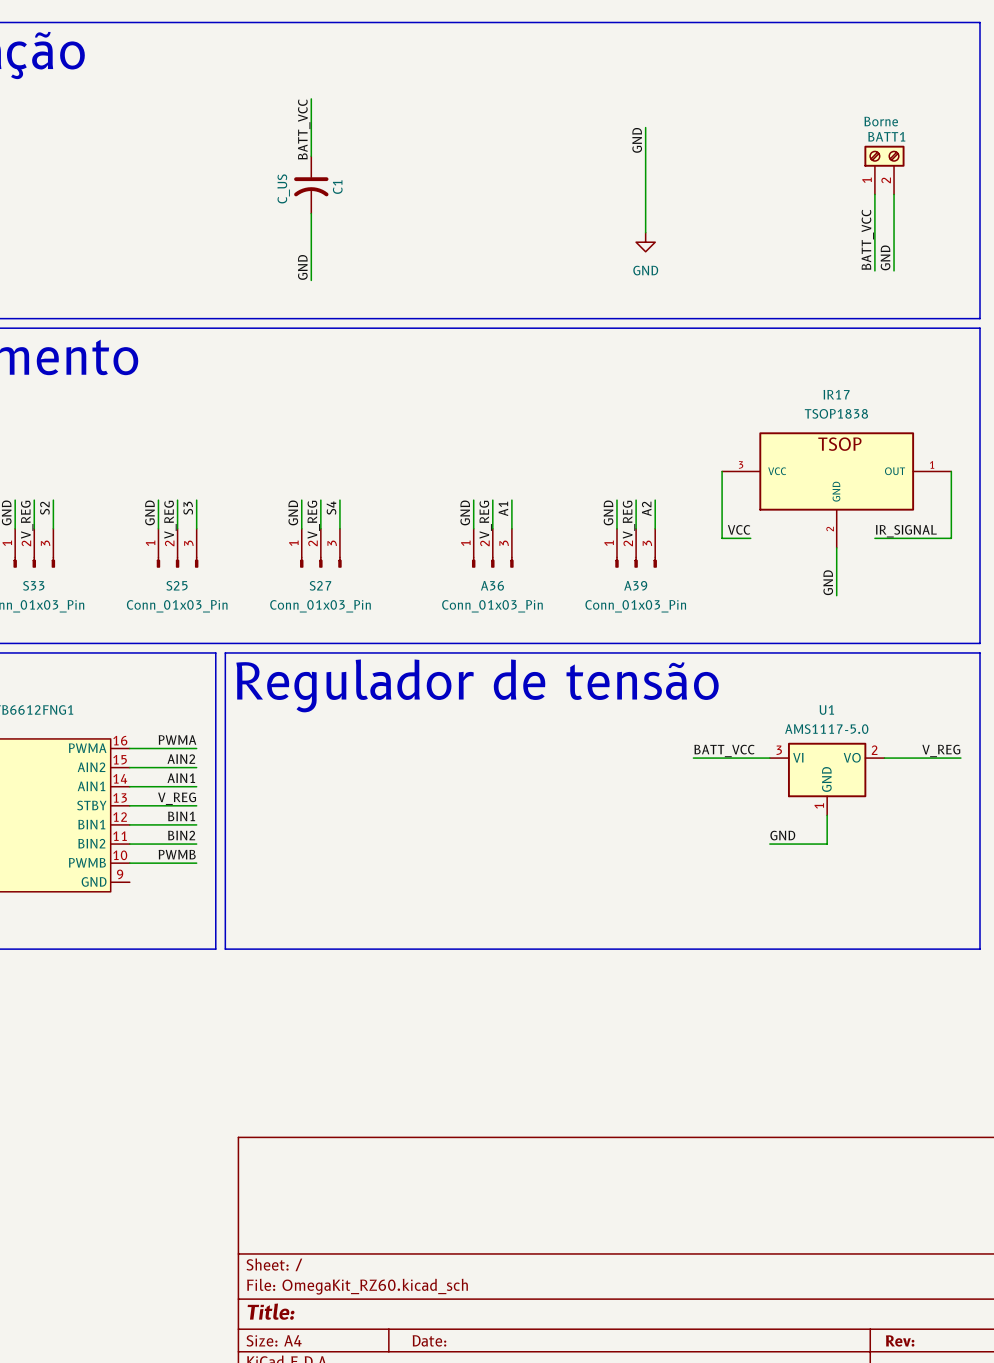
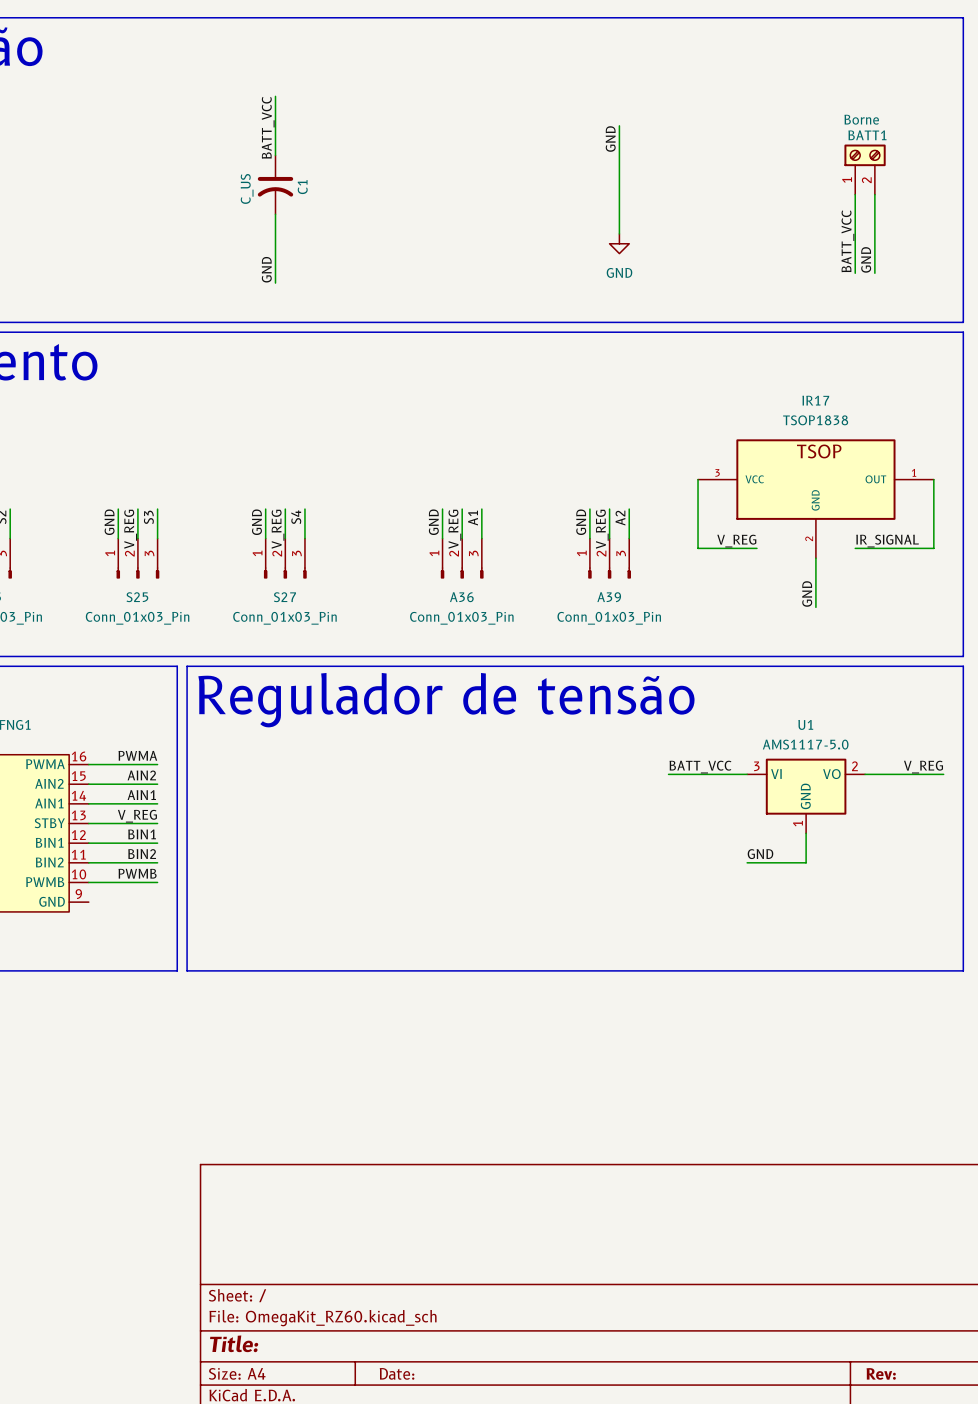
label: VCC (739, 529) -> none
label: none -> V_REG (736, 541)
wire: none -> (727, 548) (756, 548)

